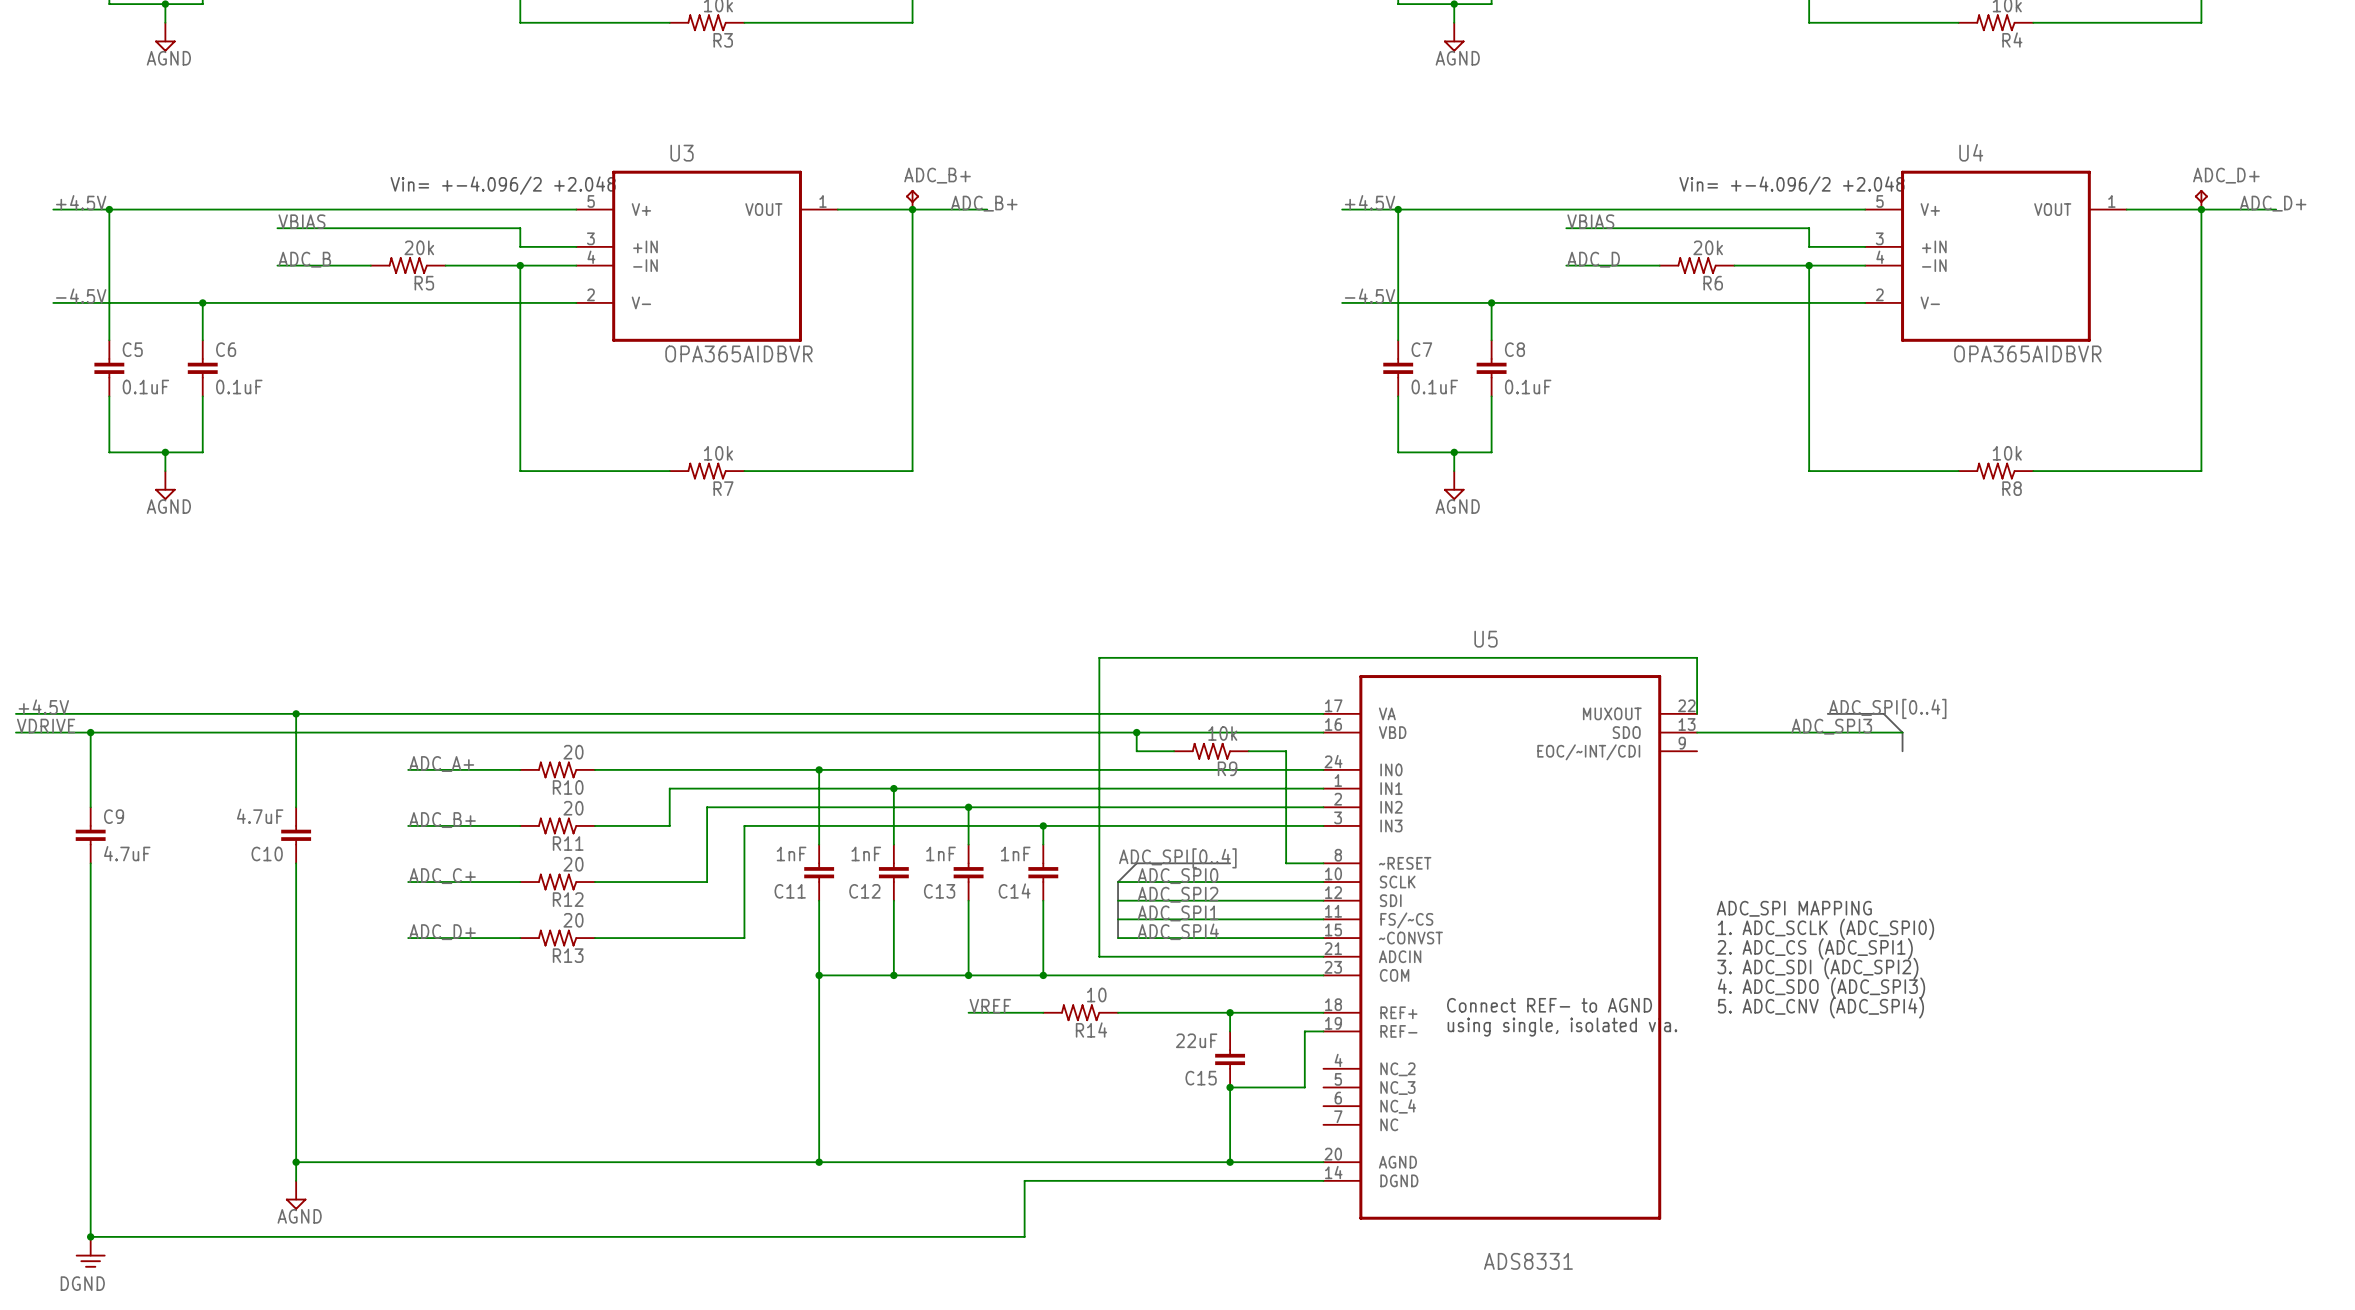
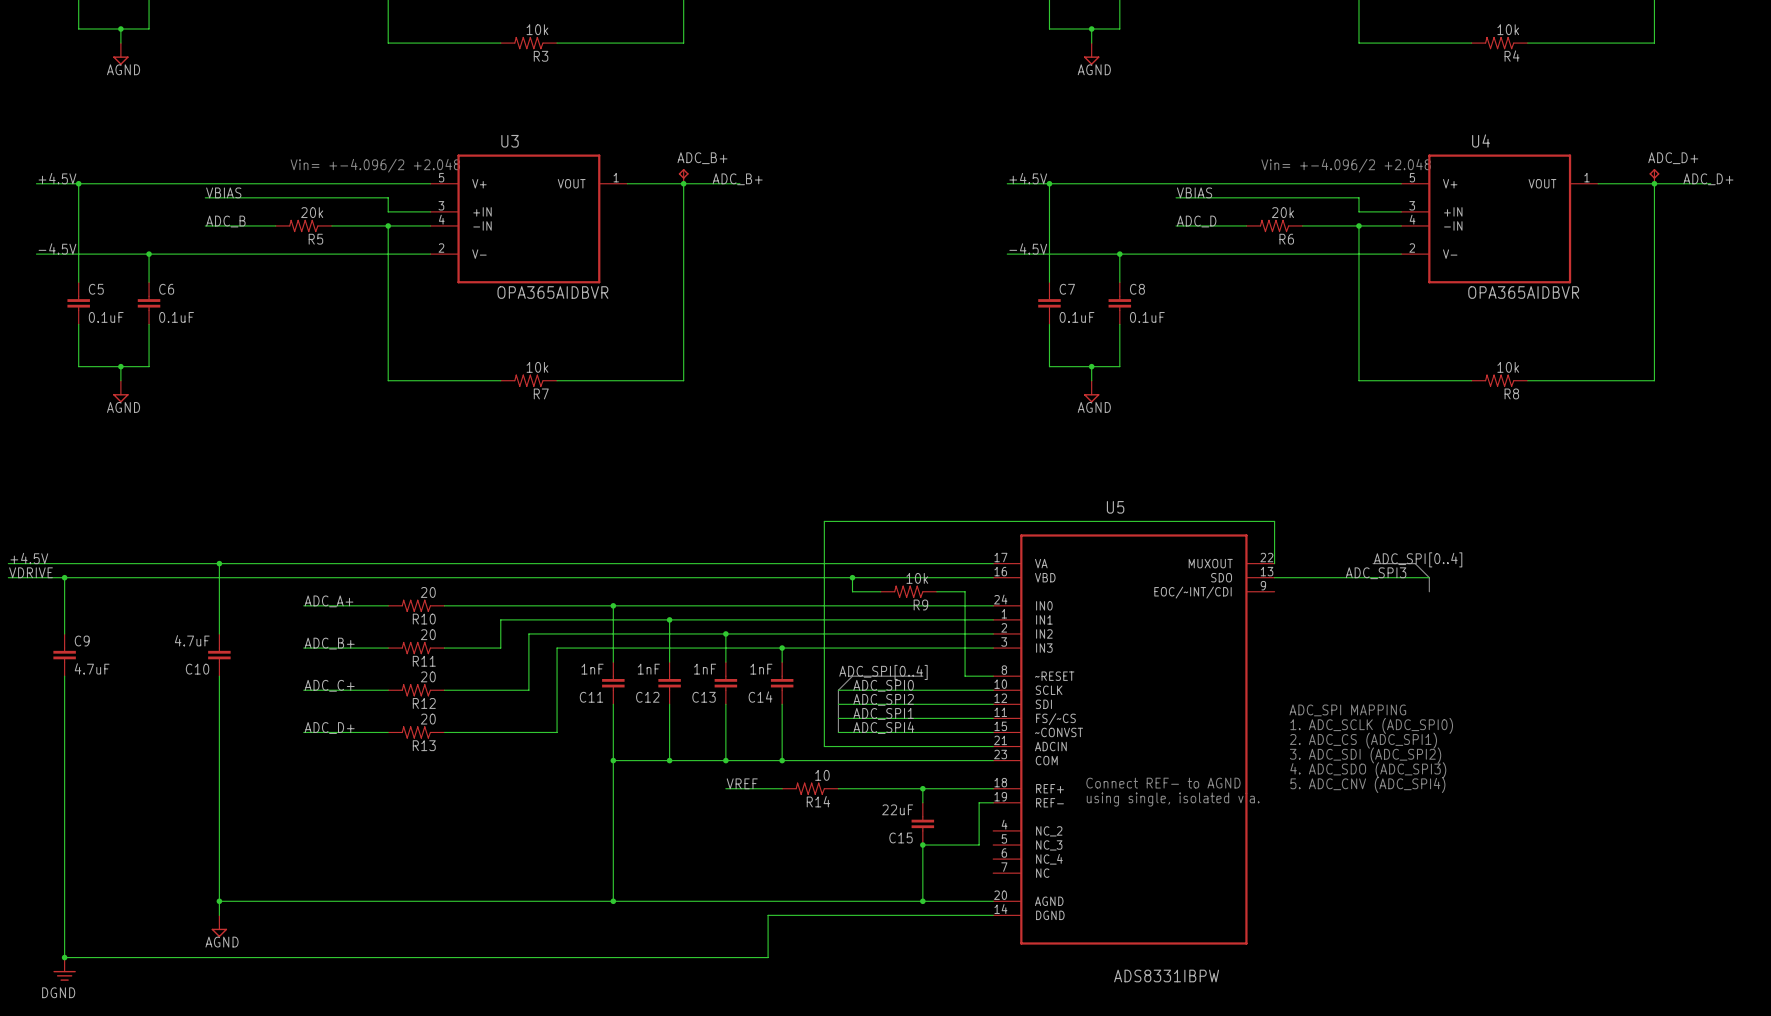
U5 value: ADS8331 (1528, 1261) -> ADS8331IBPW (1166, 976)

